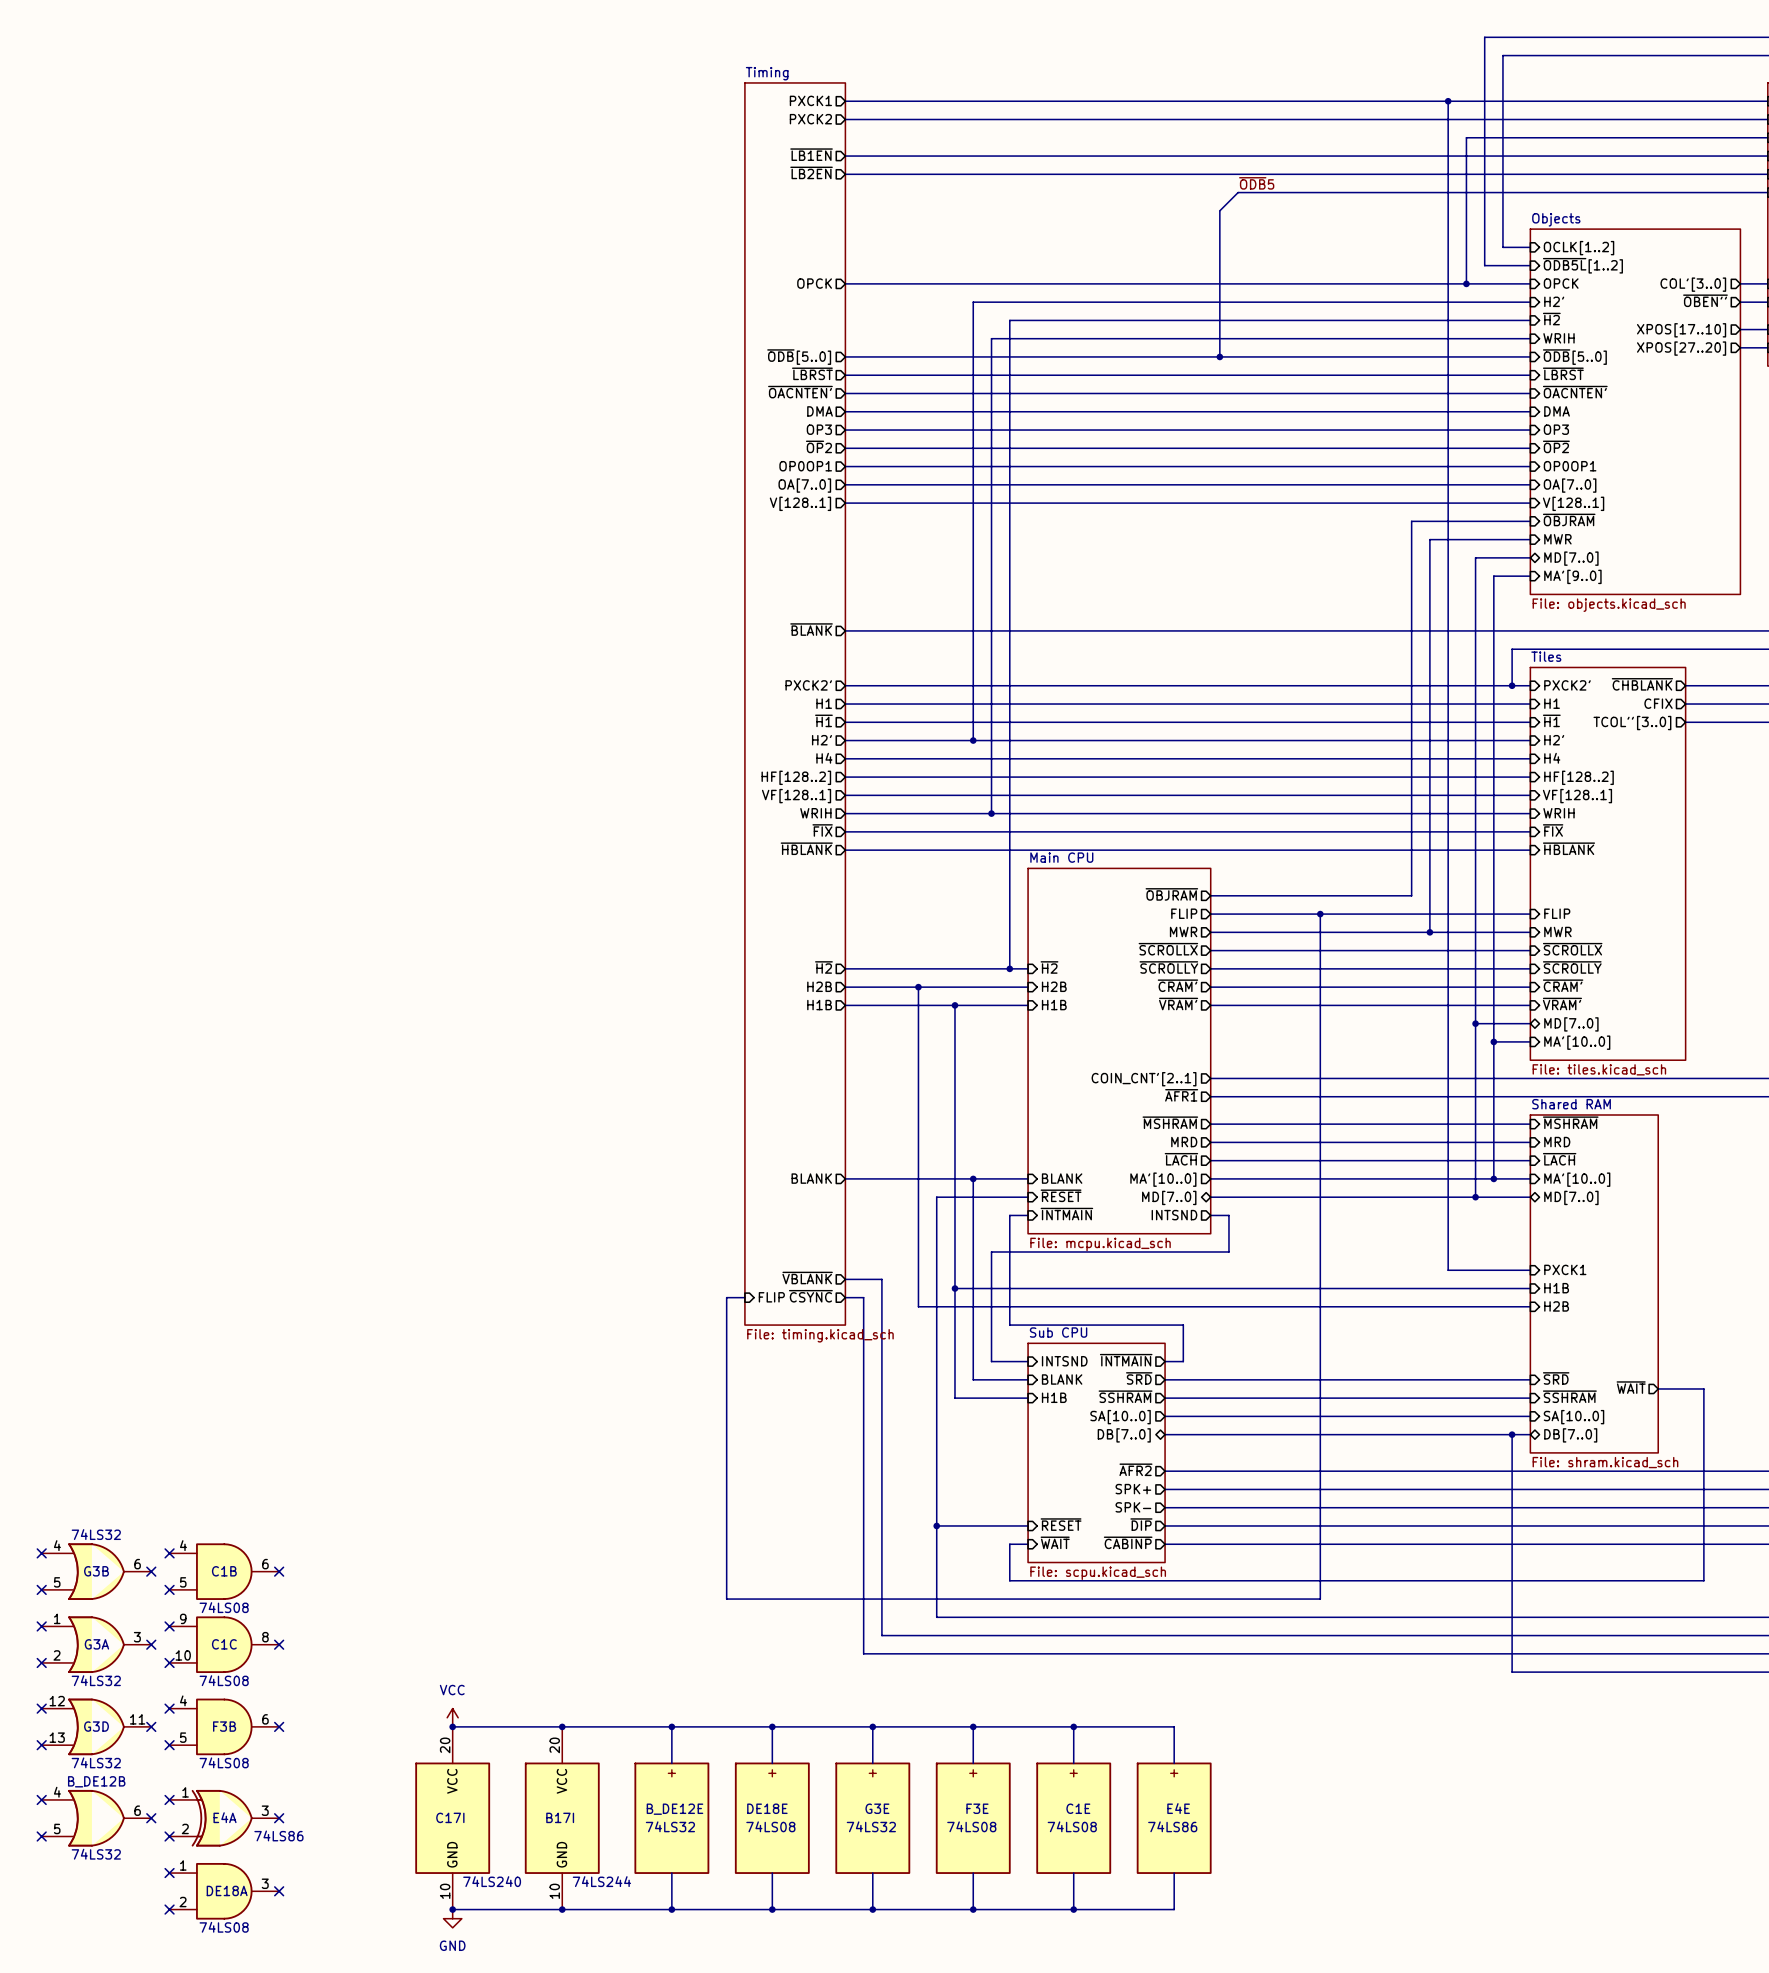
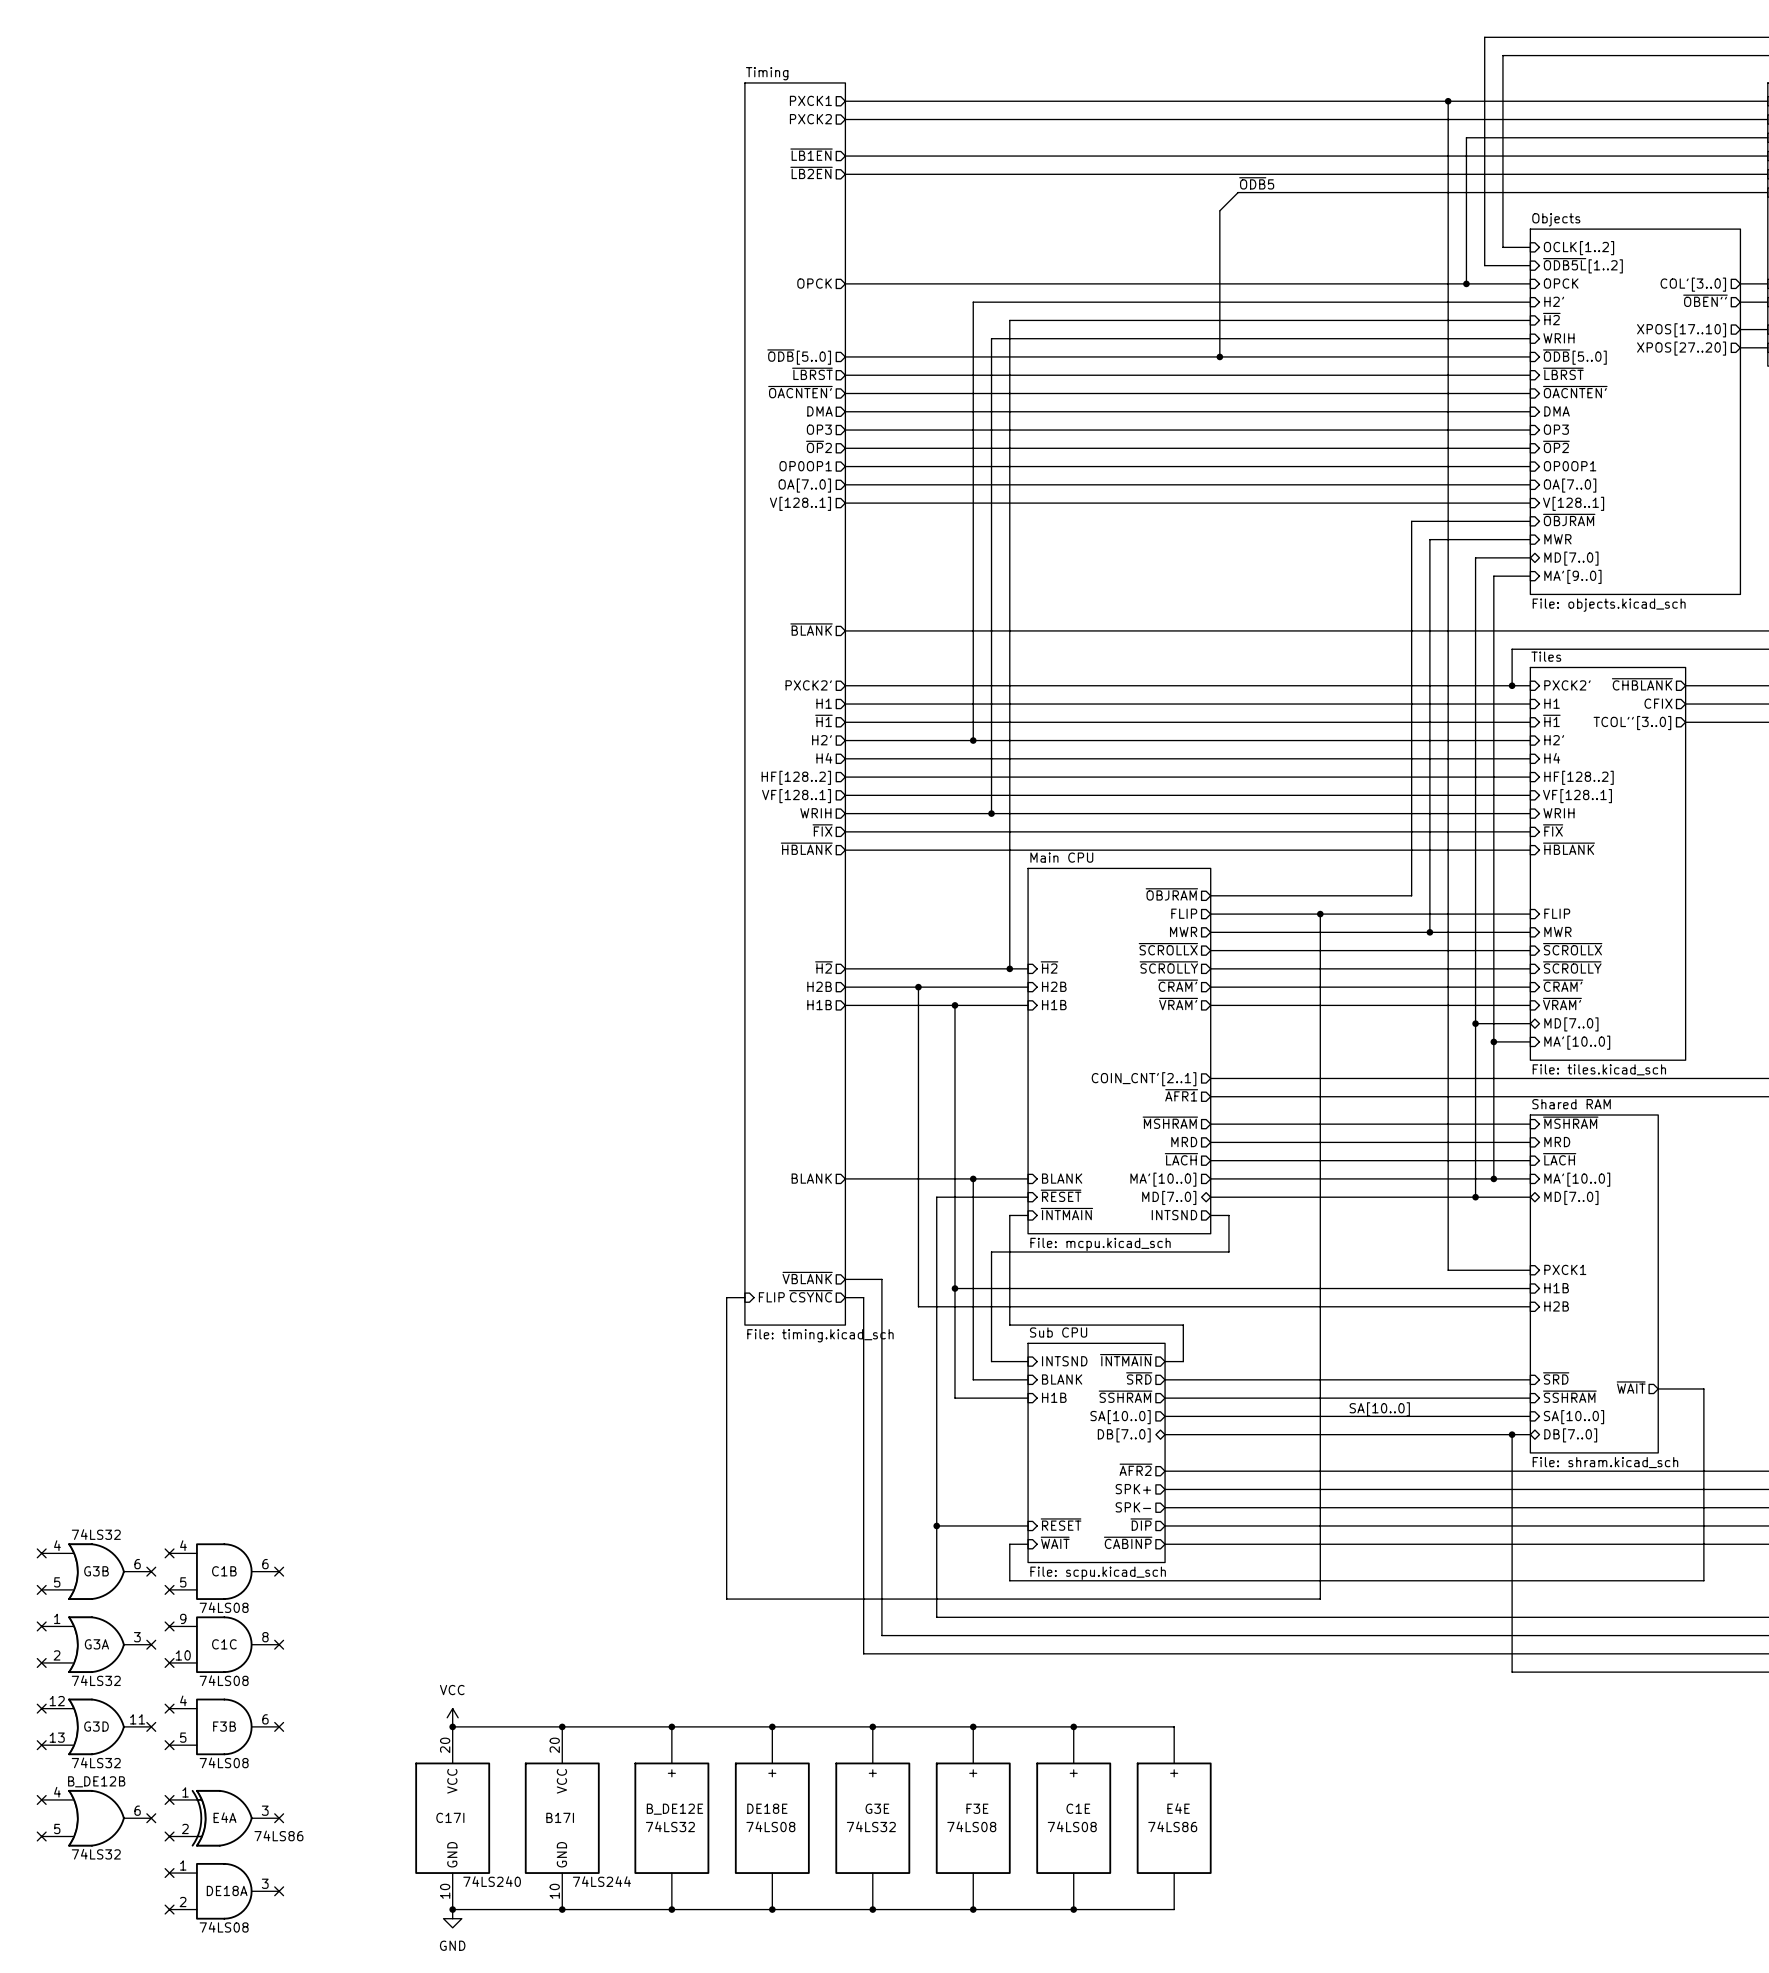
label: none -> SA[10..0] (1379, 1409)

